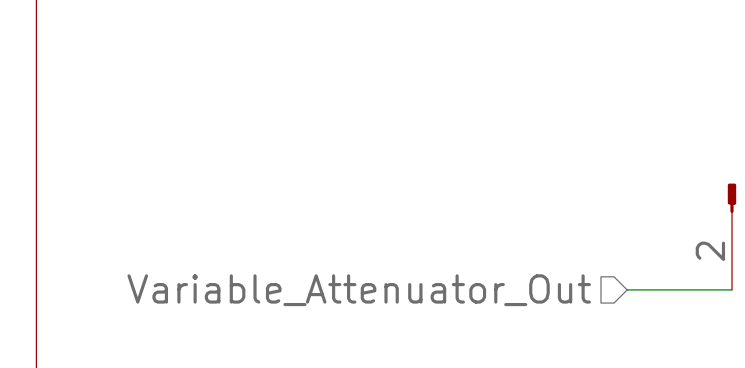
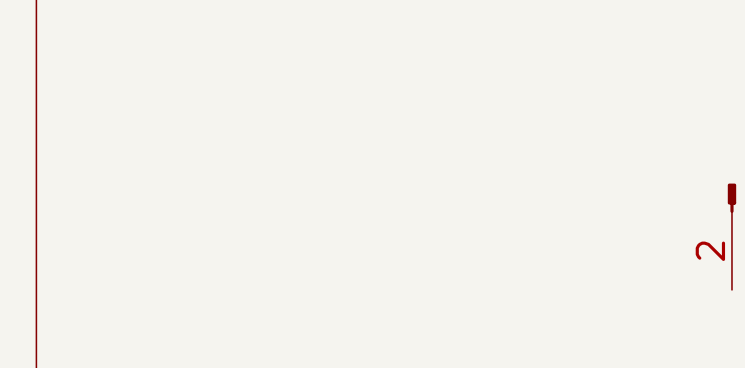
wire: (627, 289) (731, 289) -> none
hierarchical label: Variable_Attenuator_Out (359, 290) -> none

